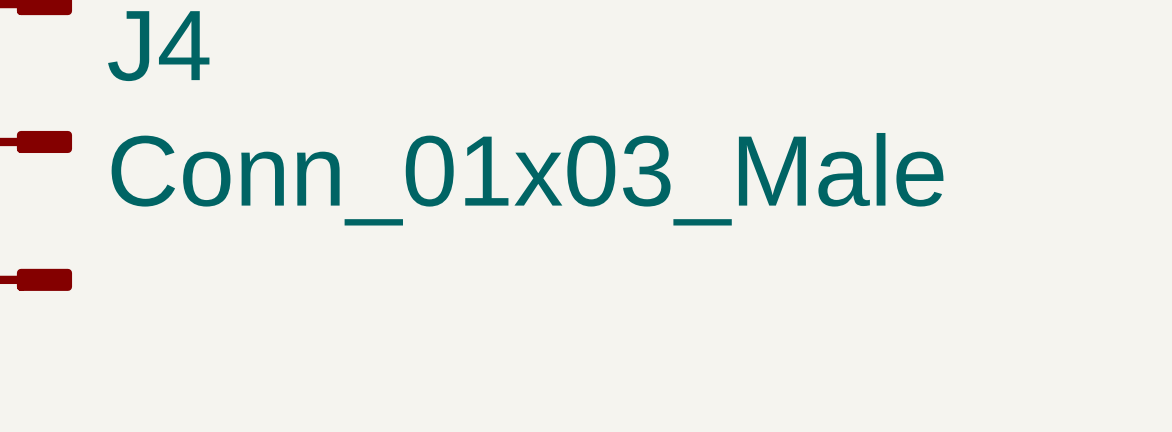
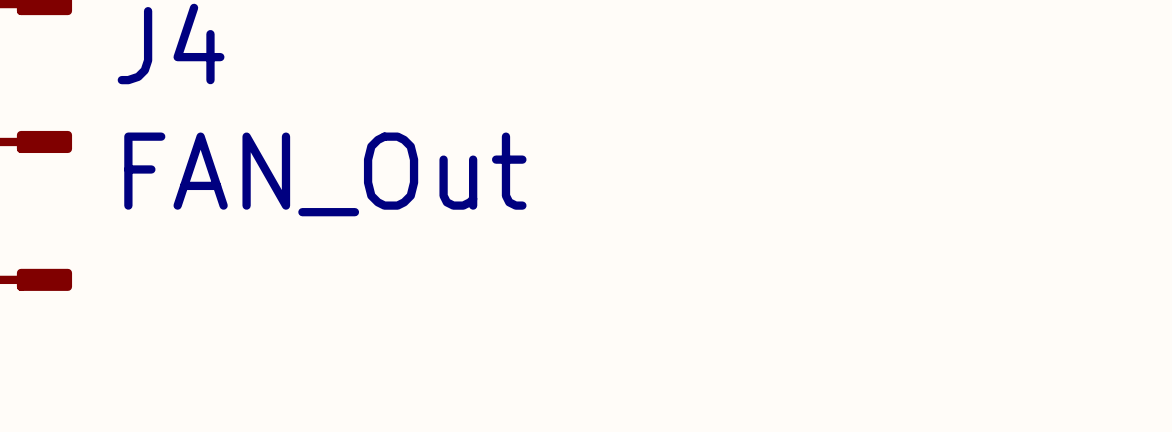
J4 value: Conn_01x03_Male (527, 179) -> FAN_Out (325, 174)

